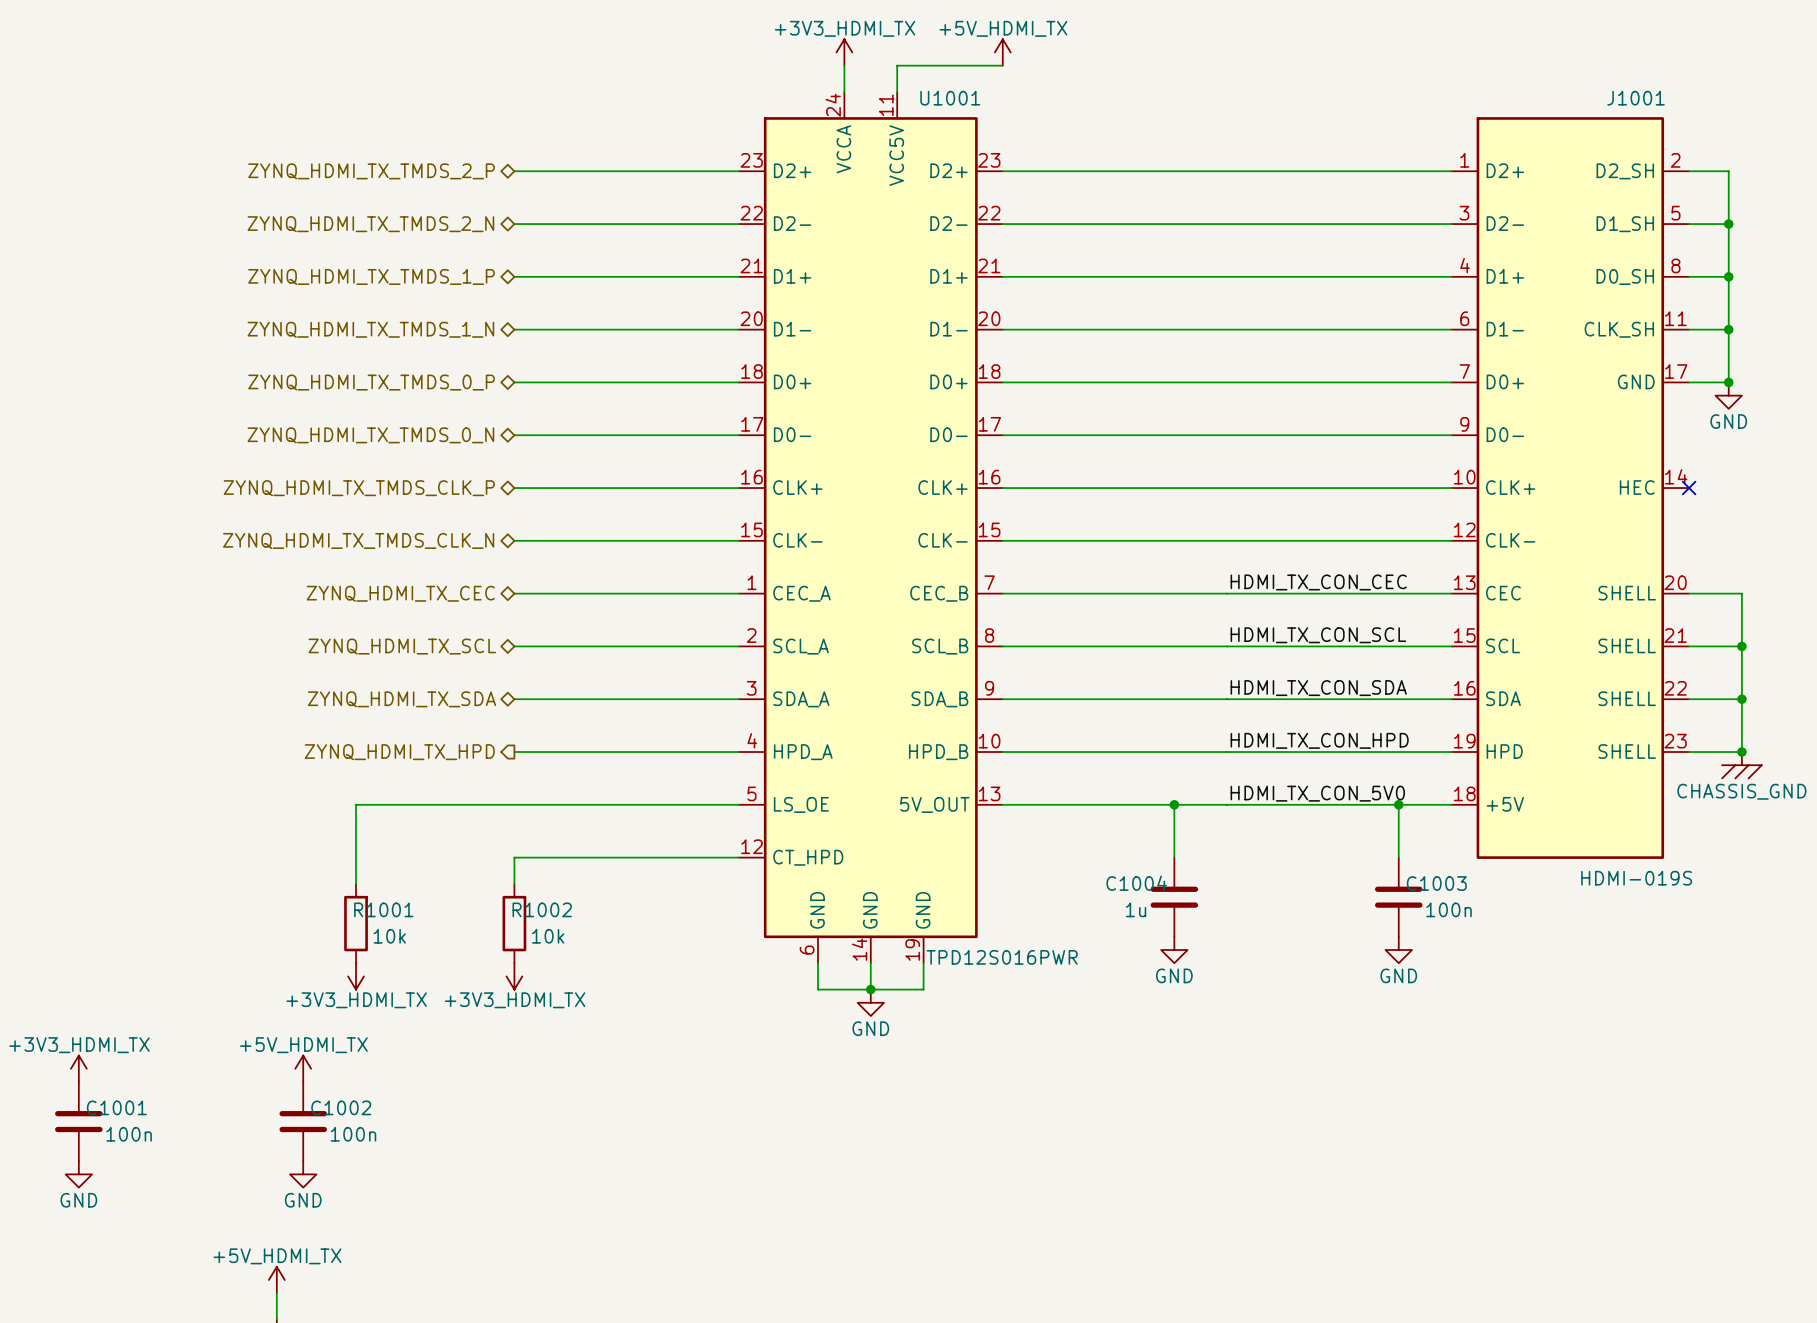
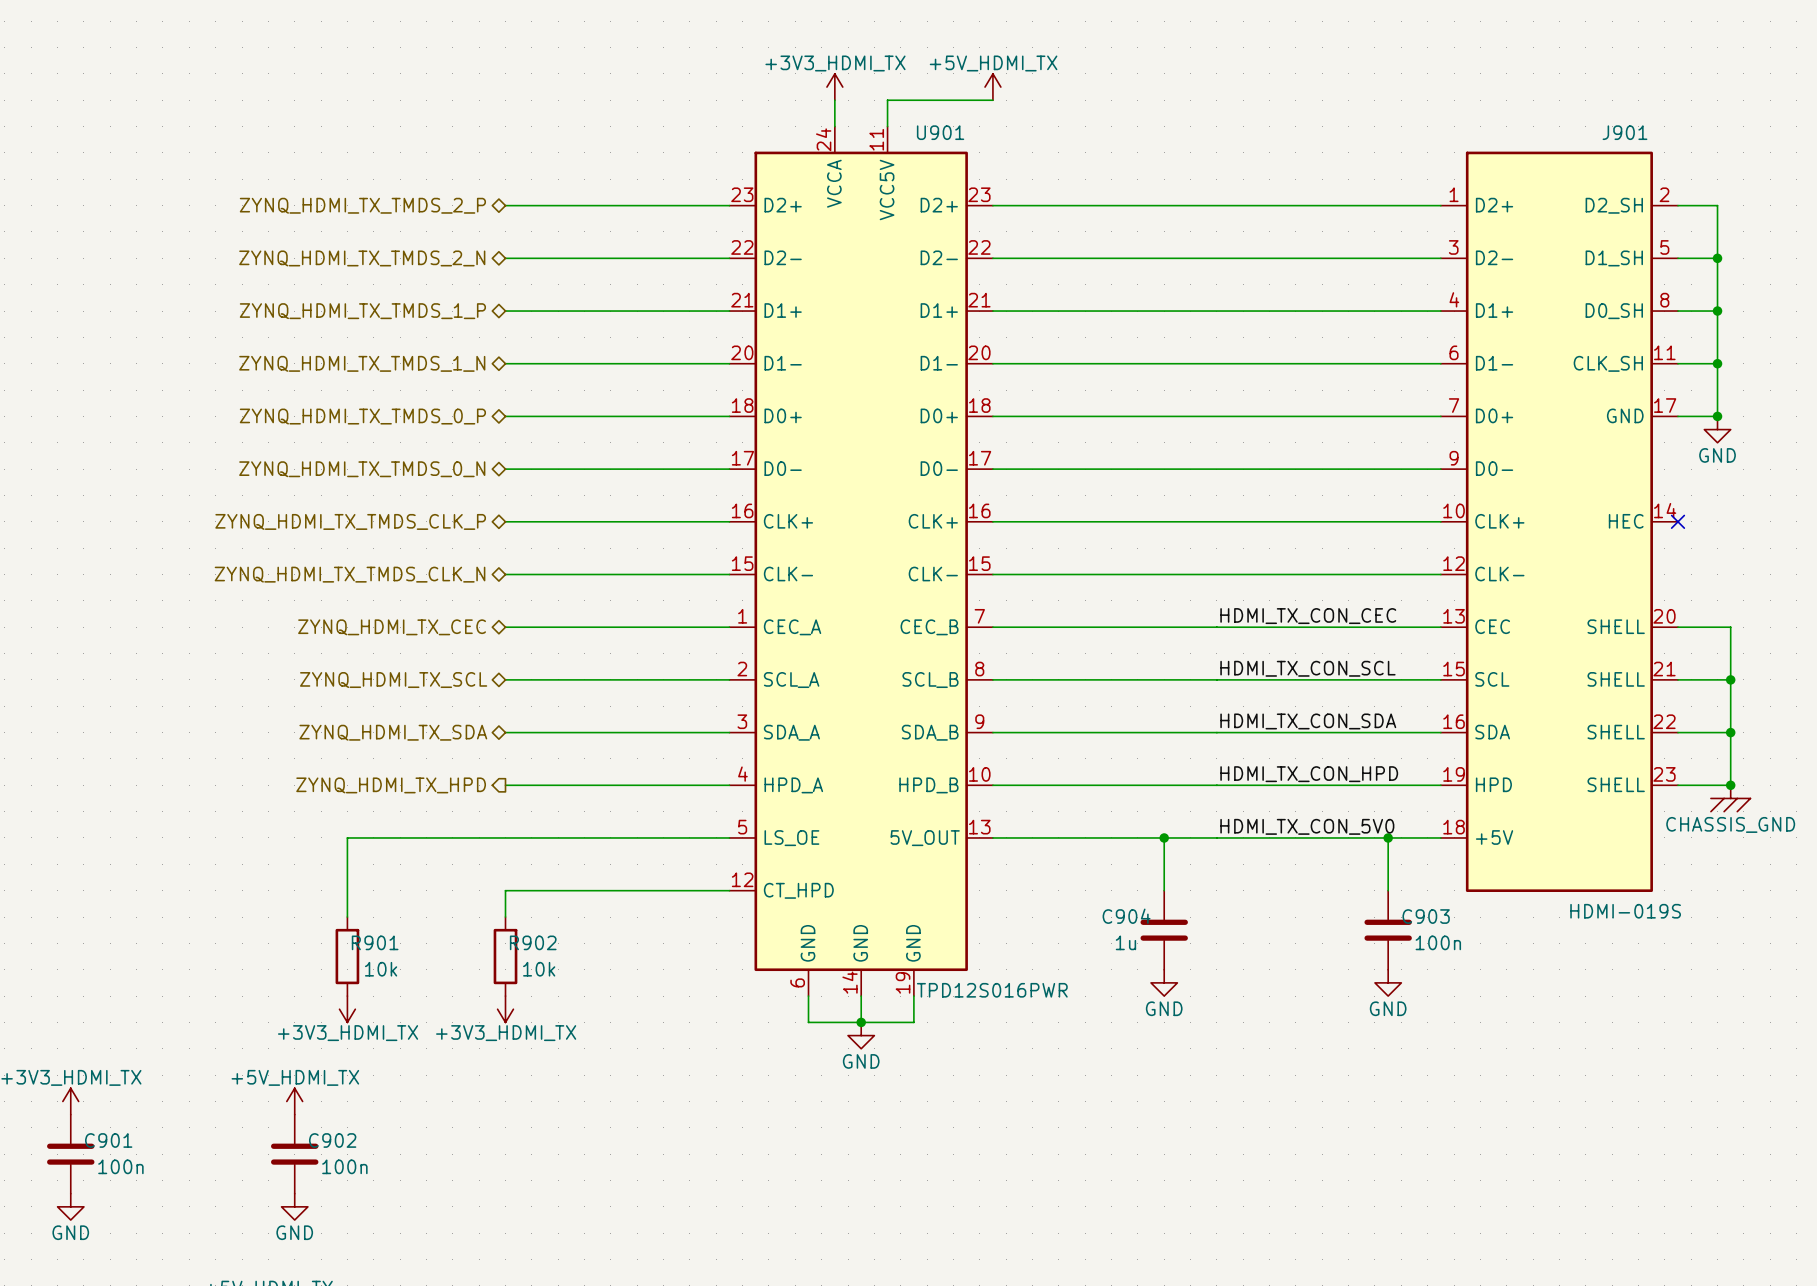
U1001 name: U1001 (950, 98) -> U901 (940, 132)
J1001 name: J1001 (1636, 98) -> J901 (1624, 132)
C1004 name: C1004 (1136, 883) -> C904 (1126, 916)
C1003 name: C1003 (1436, 883) -> C903 (1426, 916)
R1001 name: R1001 (383, 909) -> R901 (375, 942)
R1002 name: R1002 (542, 909) -> R902 (533, 942)
C1001 name: C1001 (116, 1107) -> C901 (108, 1140)
C1002 name: C1002 (341, 1107) -> C902 (332, 1140)

